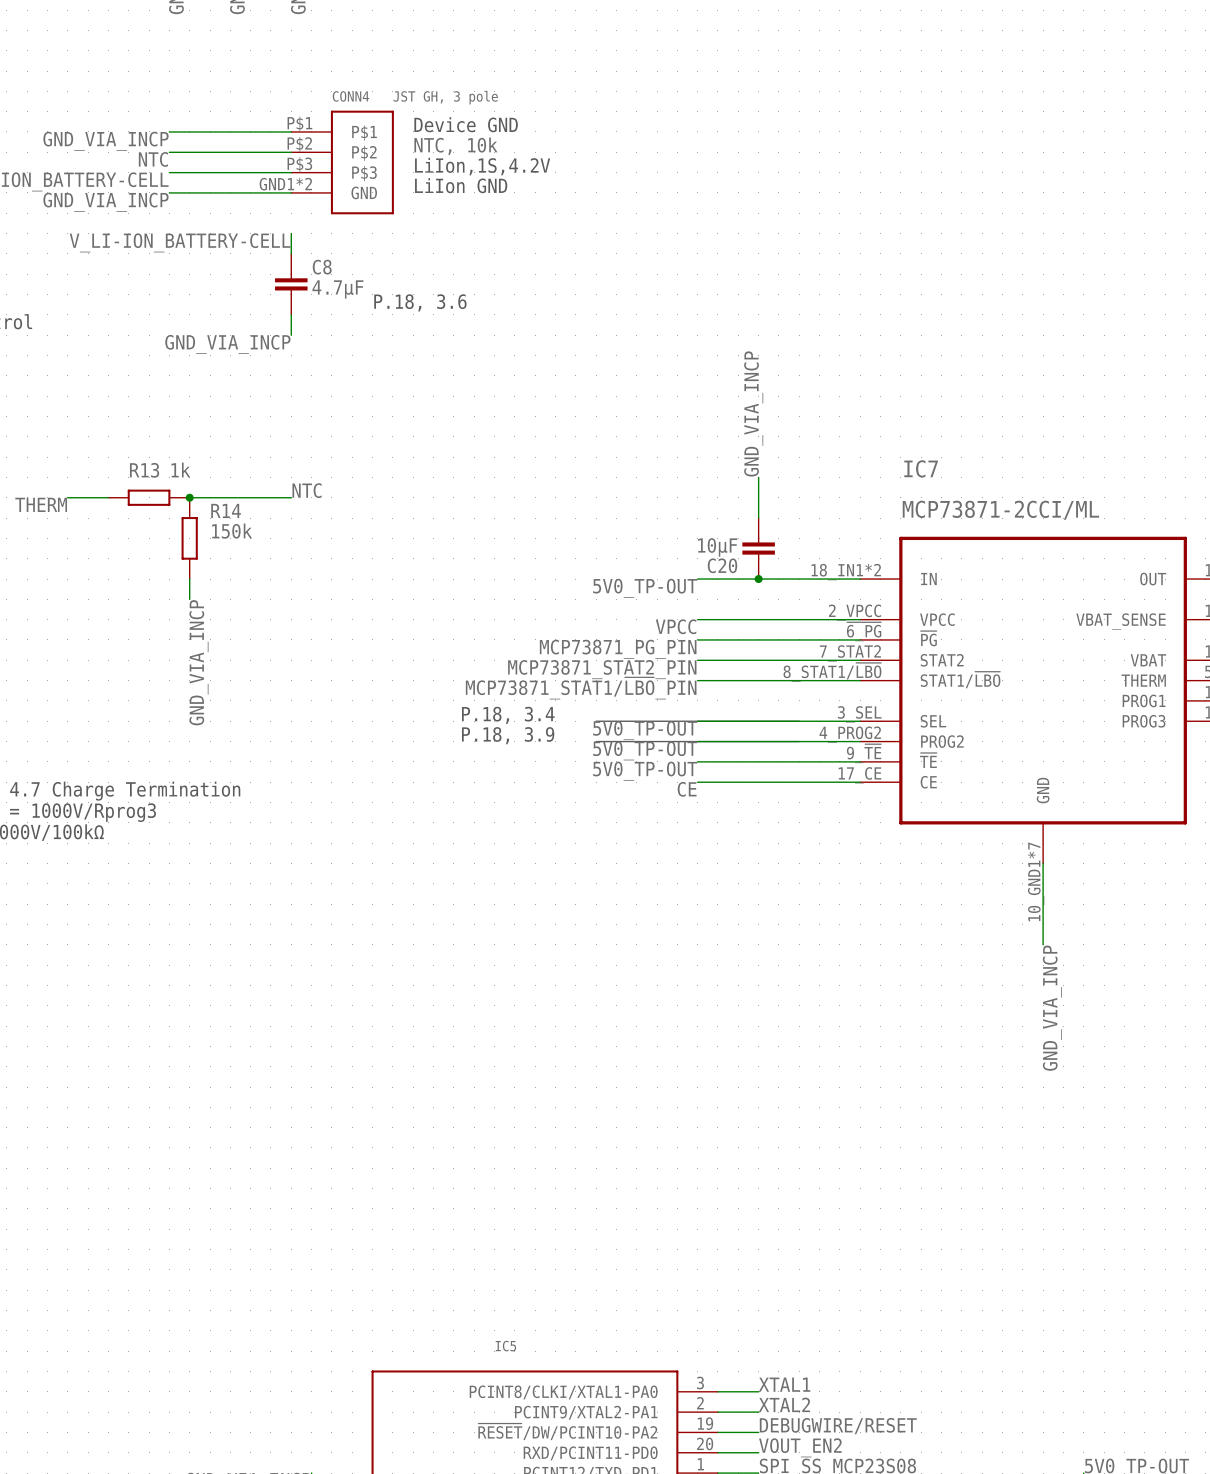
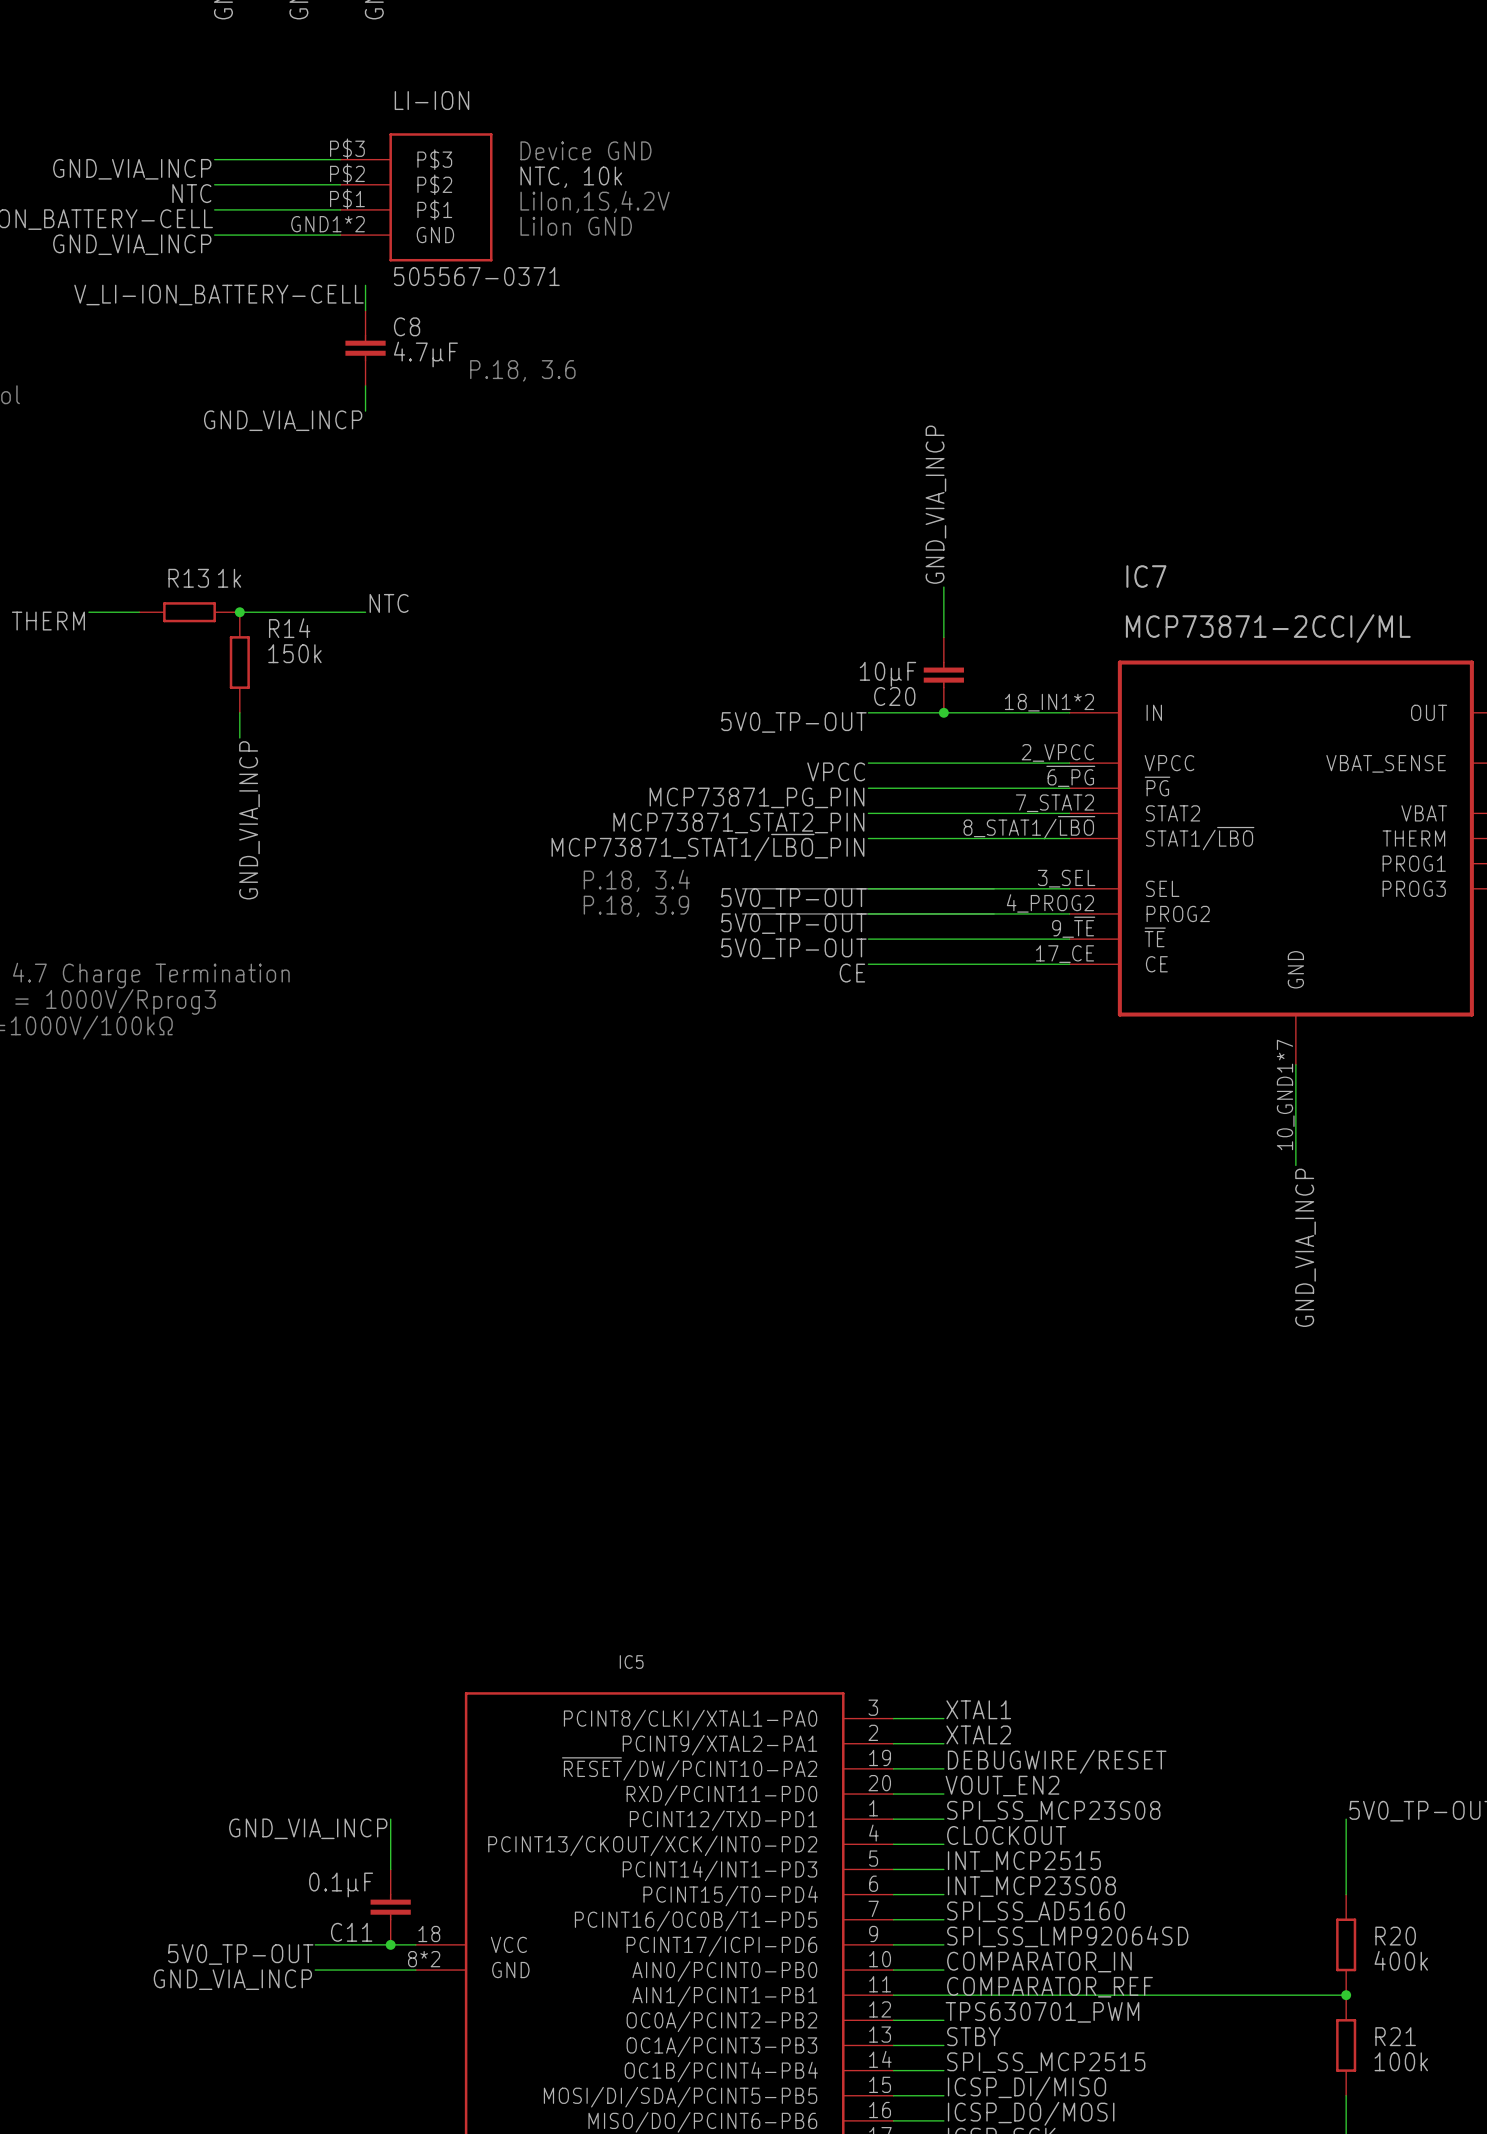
LI-ION: none -> 505567-0371 (416, 197)
CONN4: JST GH, 3 pole (342, 162) -> none

